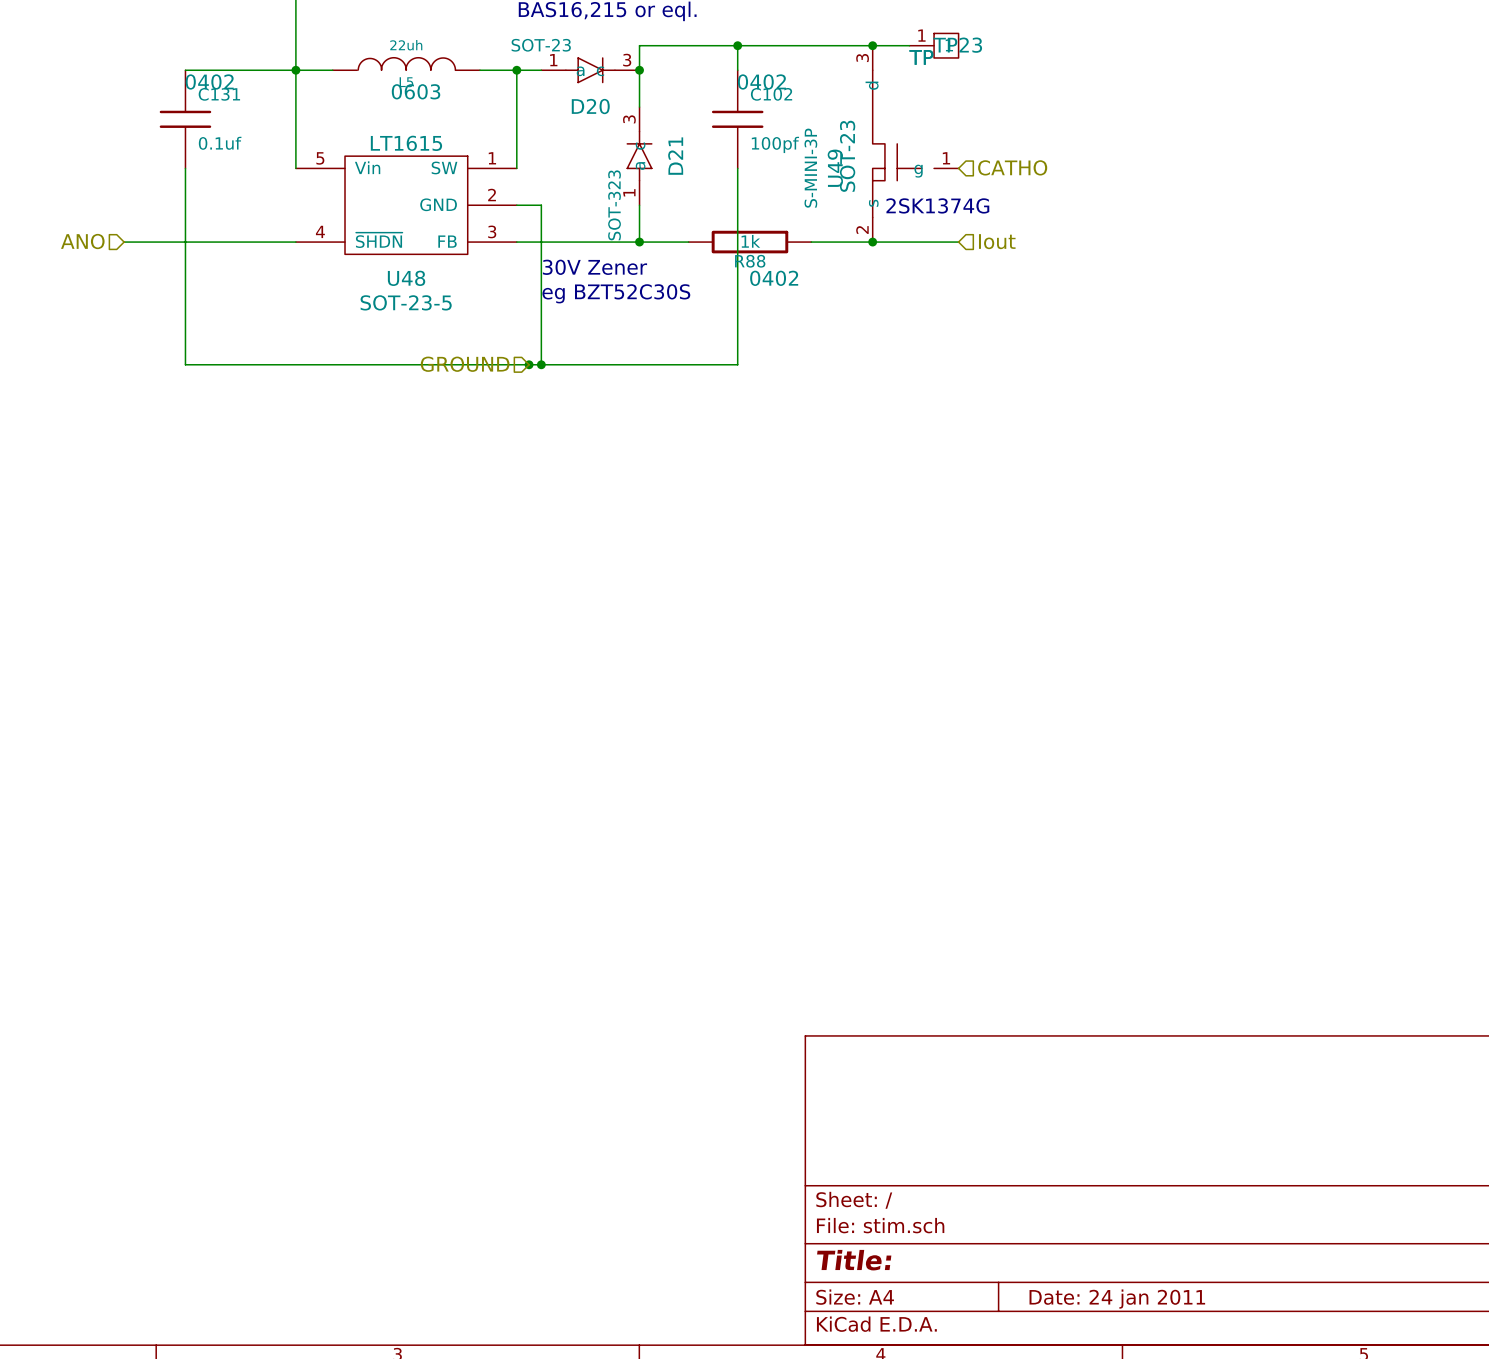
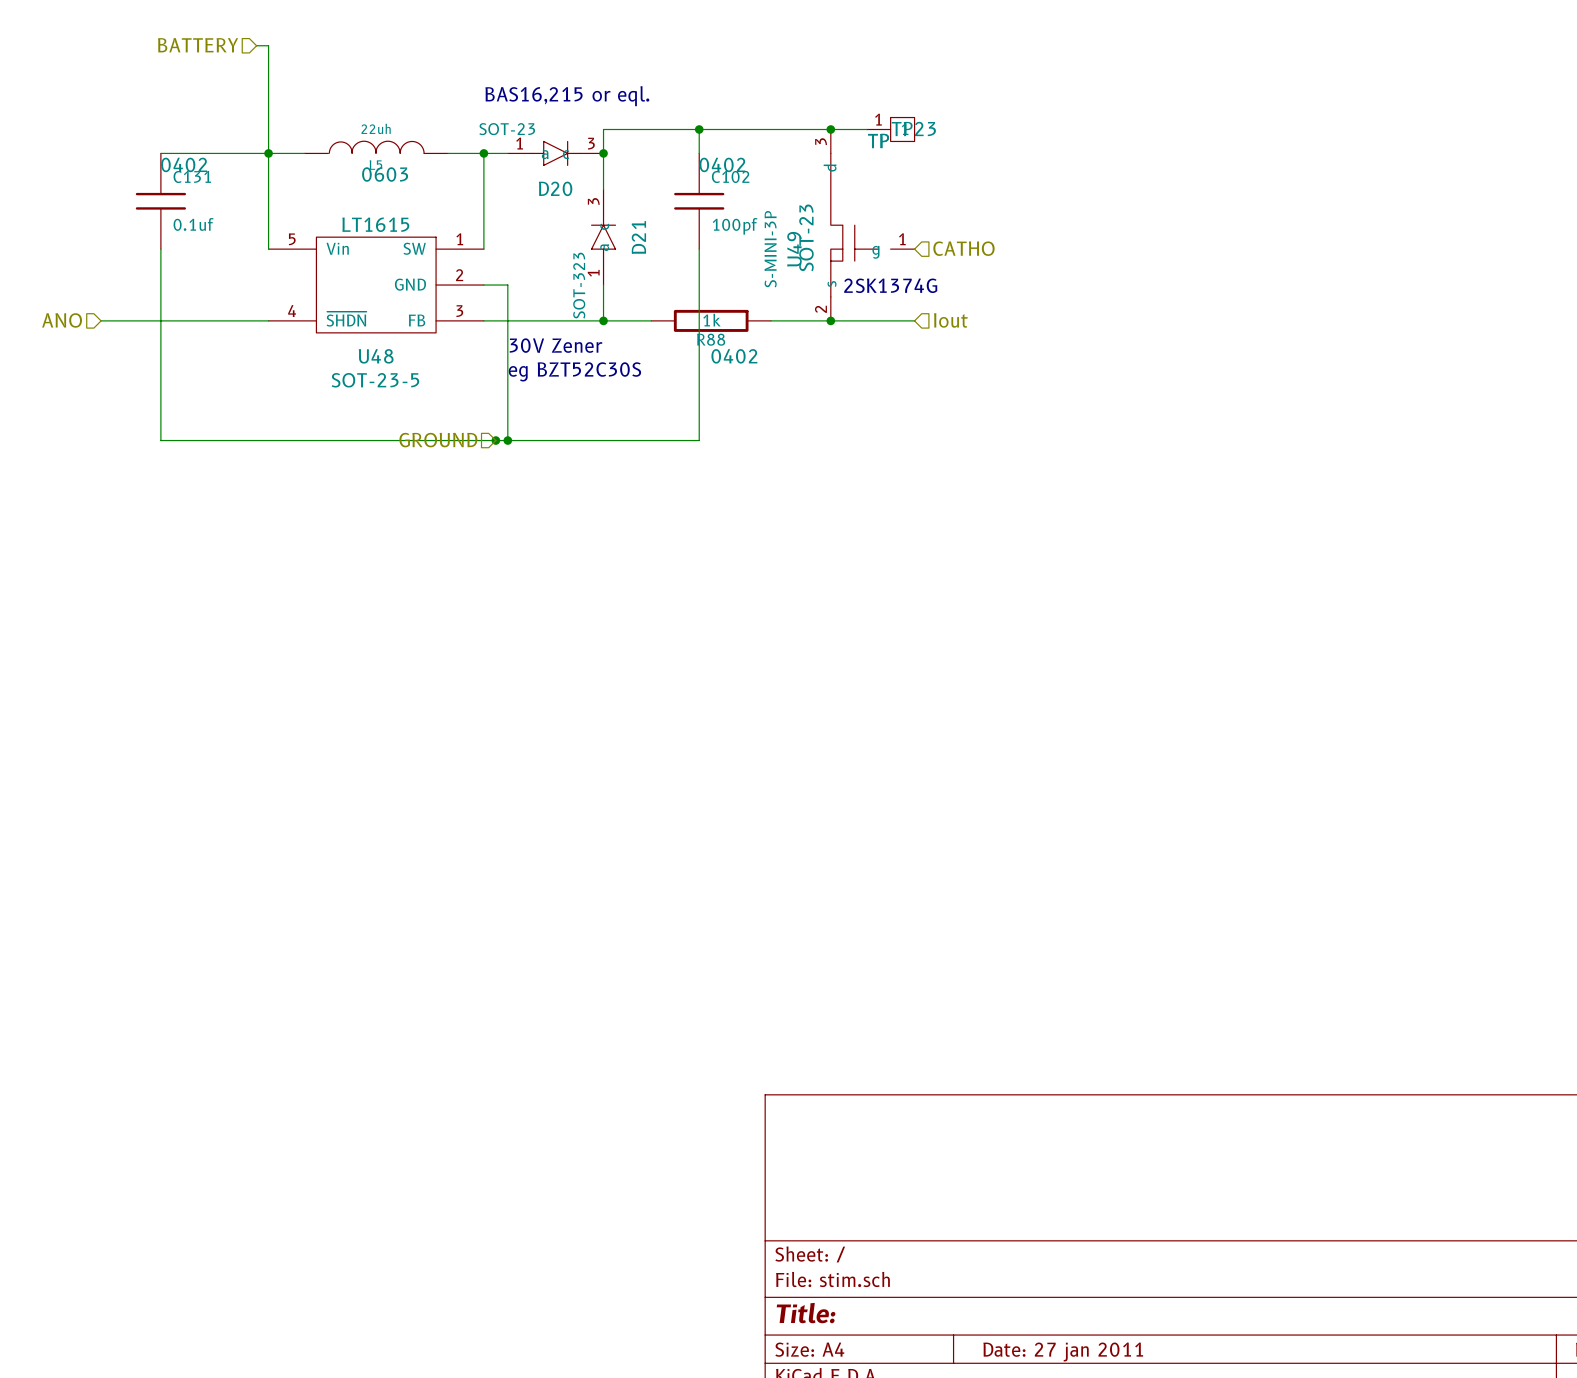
title block: Date: 24 jan 2011 (1117, 1299) -> Date: 27 jan 2011 (1063, 1351)

